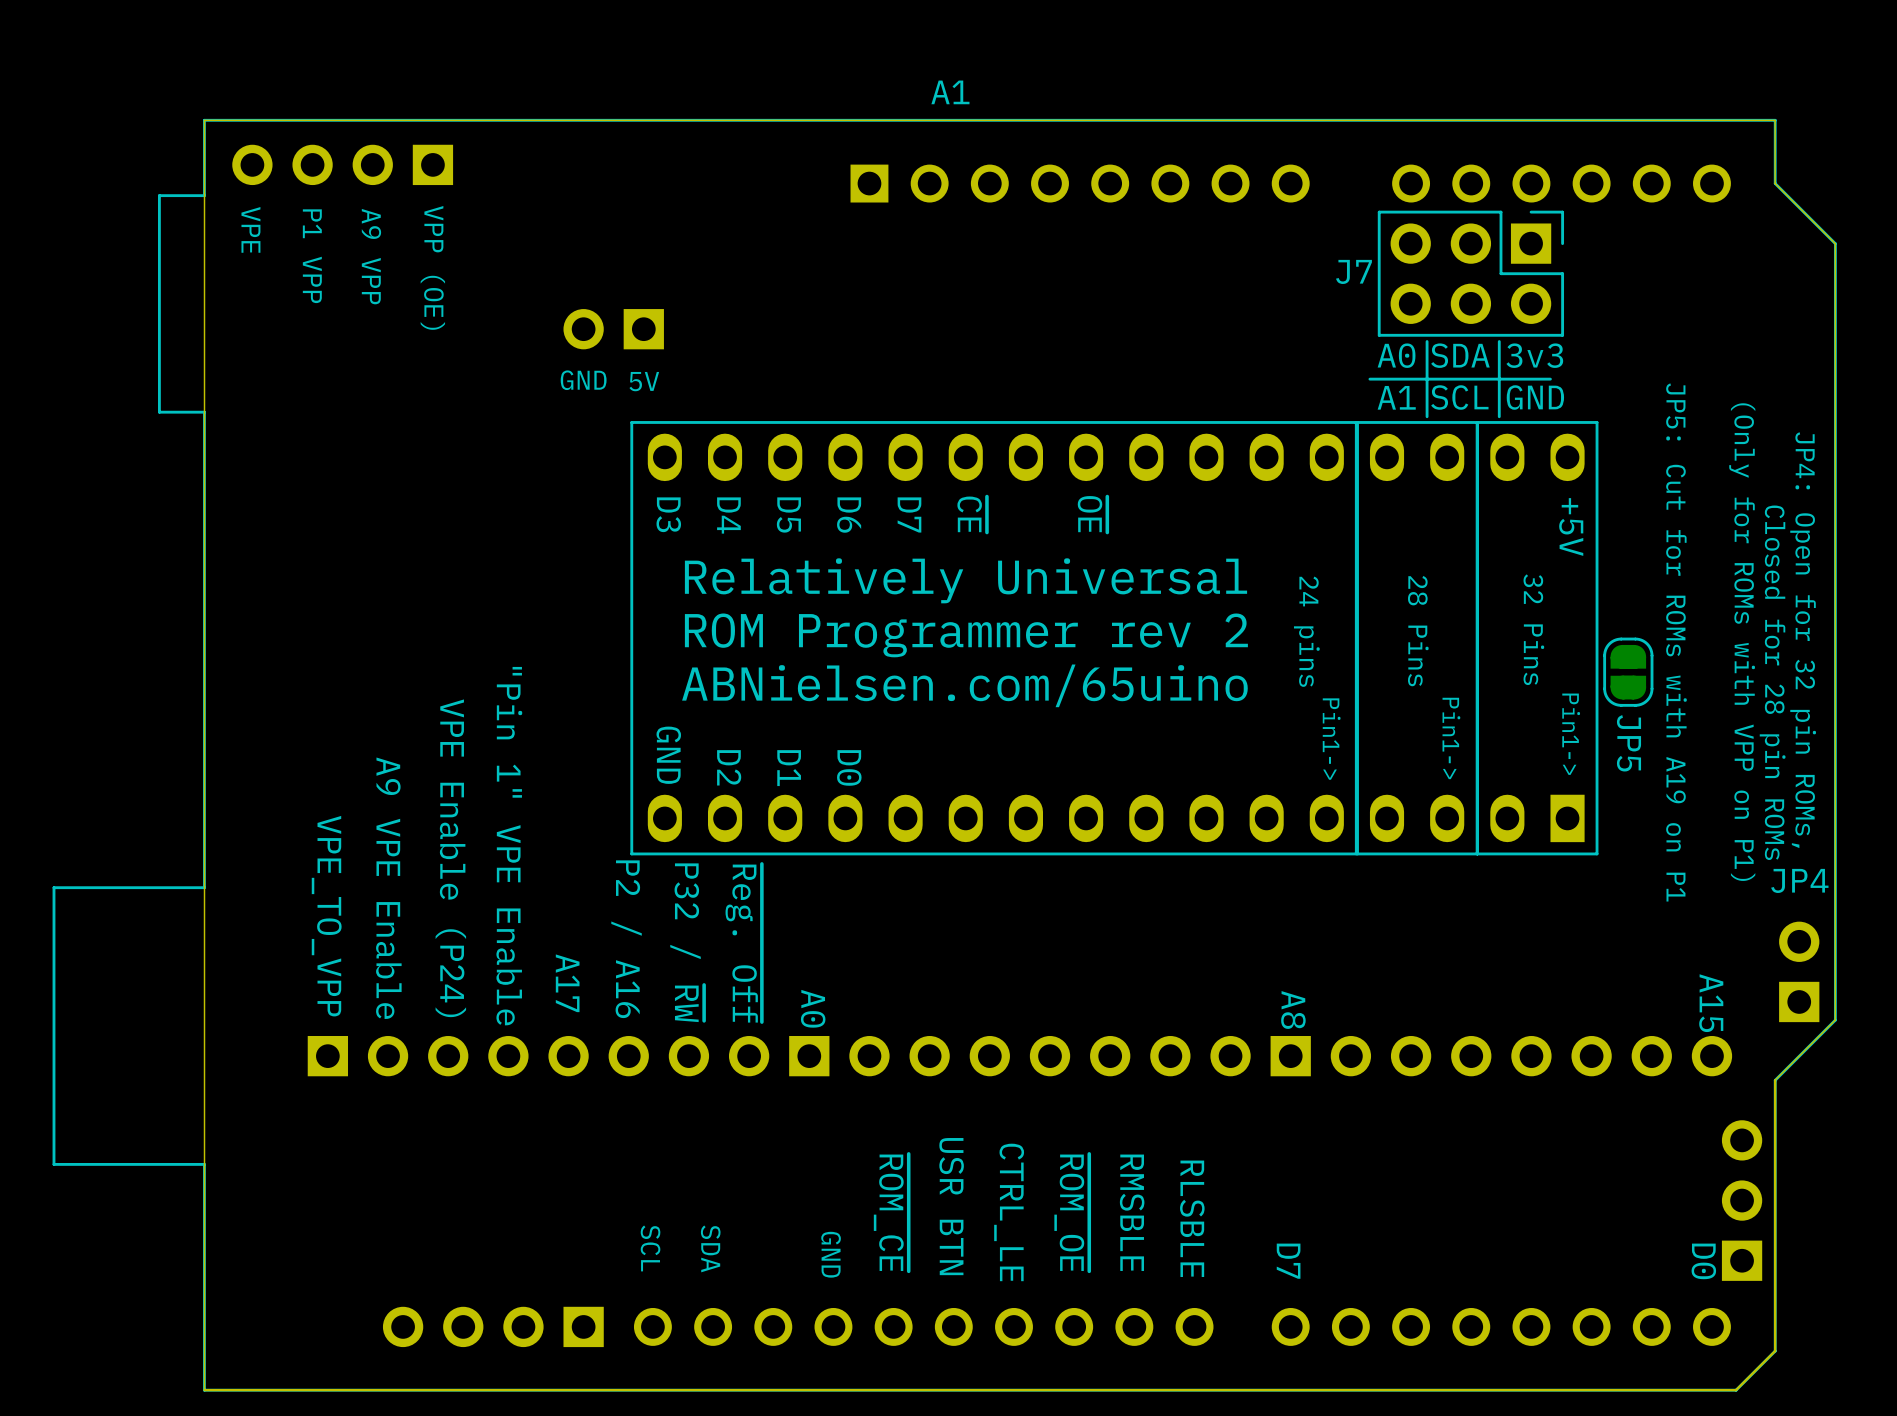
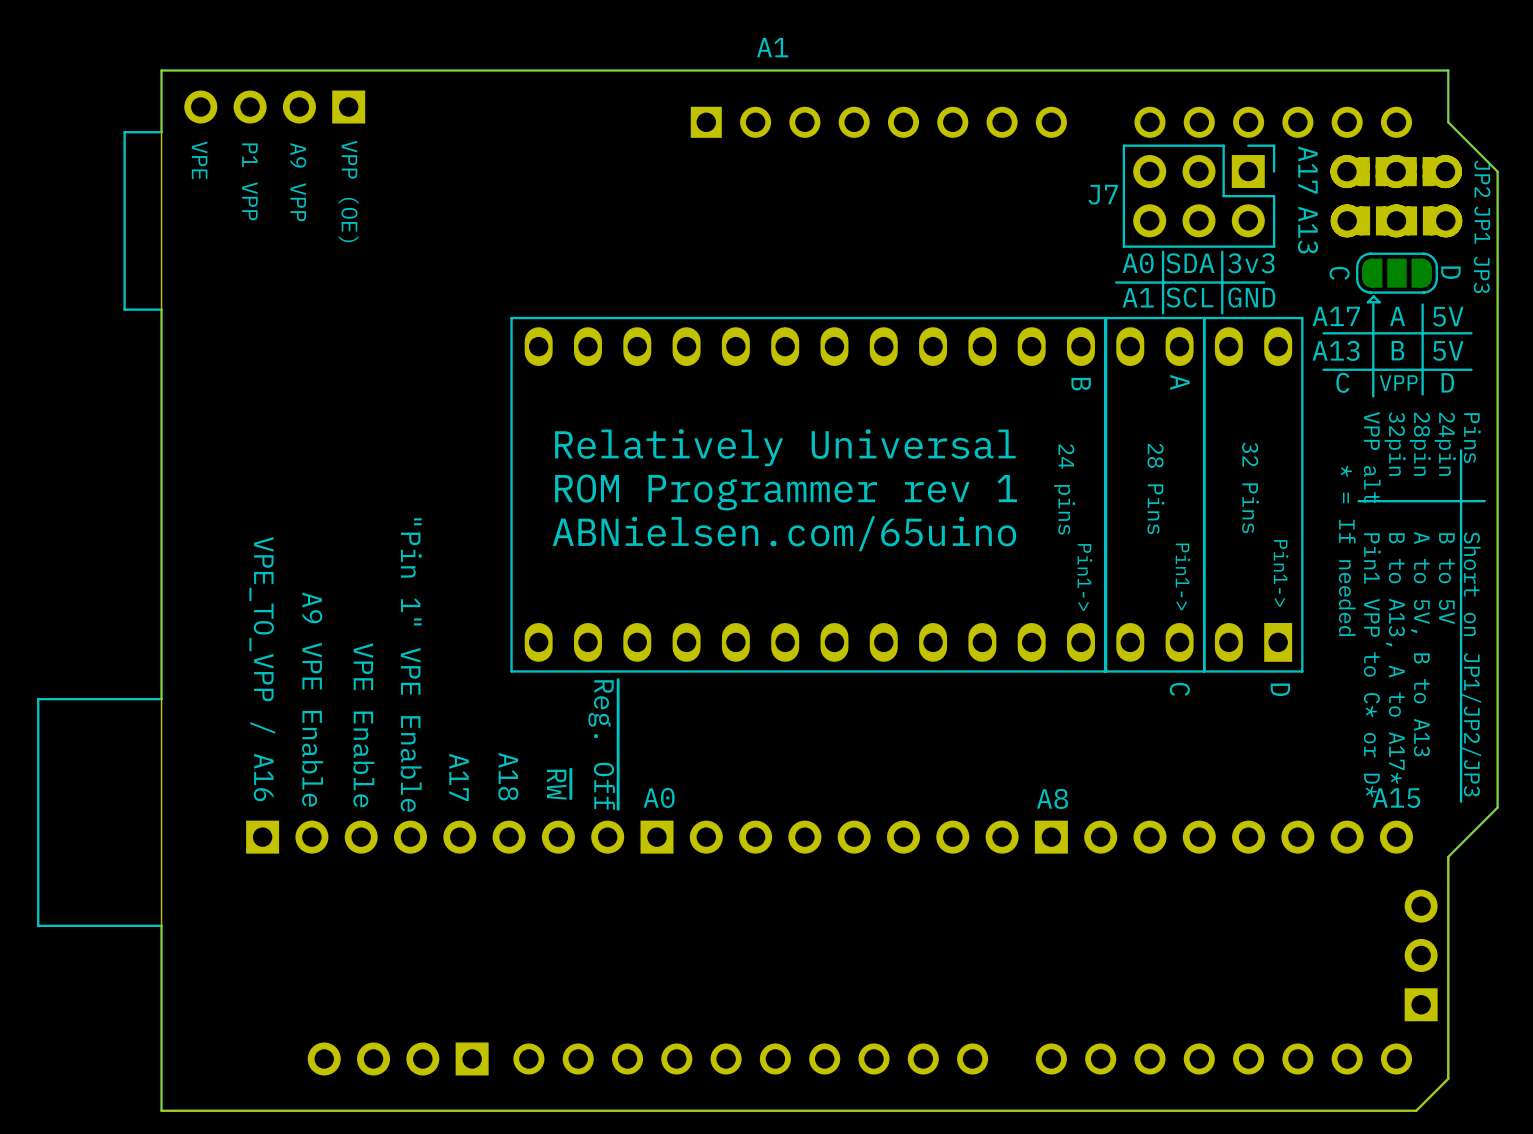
text: none -> A17 (1307, 170)
JP2: none -> (1396, 171)
JP1: none -> (1396, 220)
text: none -> A13 (1307, 230)
part: (613, 329) -> none
text: none -> C (1339, 273)
text: none -> D (1450, 272)
JP3: none -> (1396, 278)
text: GND (583, 380) -> none
text: 5V (644, 381) -> none
line: none -> (1373, 304) (1373, 396)
line: none -> (1422, 304) (1422, 394)
text: none -> A17 (1336, 316)
text: none -> A (1397, 316)
text: none -> 5V (1448, 316)
line: none -> (1471, 333) (1323, 333)
text: none -> A13 (1336, 350)
text: none -> B (1397, 350)
text: none -> 5V (1448, 350)
line: none -> (1471, 369) (1323, 369)
text: none -> A (1179, 382)
text: none -> C (1342, 382)
text: none -> VPP (1398, 383)
text: none -> D (1447, 382)
text: none -> B (1081, 384)
text: D3 (668, 514) -> none
text: D7 (909, 514) -> none
text: ~{CE} (972, 514) -> none
text: ~{OE} (1092, 514) -> none
text: D4 (728, 515) -> none
text: D5 (788, 515) -> none
text: D6 (849, 515) -> none
text: +5V (1571, 527) -> none
line: none -> (1461, 450) (1461, 801)
text: ROM Programmer rev 2 (966, 635) -> ROM Programmer rev 1 (786, 492)
text: JP4: Open for 32 pin ROMs, (1803, 640) -> none
text: JP5: Cut for ROMs with A19 on P1 (1676, 642) -> none
text: (Only for ROMs with VPP on P1) (1742, 642) -> none
line: none -> (1484, 501) (1358, 501)
text: none -> 24pin B to 5V (1445, 518)
JP5: (1628, 672) -> none
text: Closed for 28 pin ROMs (1772, 682) -> none
text: none -> * = If needed (1347, 550)
text: none -> 28pin A to 5V, B to A13 (1420, 584)
text: GND (668, 755) -> none
text: none -> 32pin B to A13, A to A17* (1395, 598)
text: D2 (729, 767) -> none
text: D0 (849, 767) -> none
text: D1 (789, 768) -> none
text: none -> VPP alt Pin1 VPP to C* or D* (1372, 604)
text: none -> Pins Short on JP1/JP2/JP3 (1471, 604)
text: VPE Enable (P24) (450, 858) -> VPE Enable (363, 725)
text: none -> C (1179, 689)
text: none -> D (1280, 689)
text: VPE_TO_VPP (326, 916) -> VPE_TO_VPP / A16 (262, 669)
text: P2 / A16 (626, 939) -> none
text: P32 / ~{RW} (687, 942) -> ~{RW} (558, 784)
JP4: (1799, 971) -> none
text: none -> A18 (508, 776)
text rotation: 0° (1711, 1003) -> 90° counterclockwise (1396, 798)
text rotation: 0° (813, 1008) -> 90° counterclockwise (659, 797)
text rotation: 0° (1293, 1009) -> 90° counterclockwise (1052, 798)
text: USR BTN (951, 1206) -> none
text: ~{ROM_CE} (891, 1212) -> none
text: CTRL_LE (1009, 1212) -> none
text: ~{ROM_OE} (1071, 1212) -> none
text: RMSBLE (1132, 1212) -> none
text: RLSBLE (1192, 1218) -> none
text: SCL (650, 1248) -> none
text: SDA (710, 1248) -> none
text: GND (831, 1254) -> none
text: D7 (1288, 1261) -> none
text: D0 (1703, 1261) -> none

